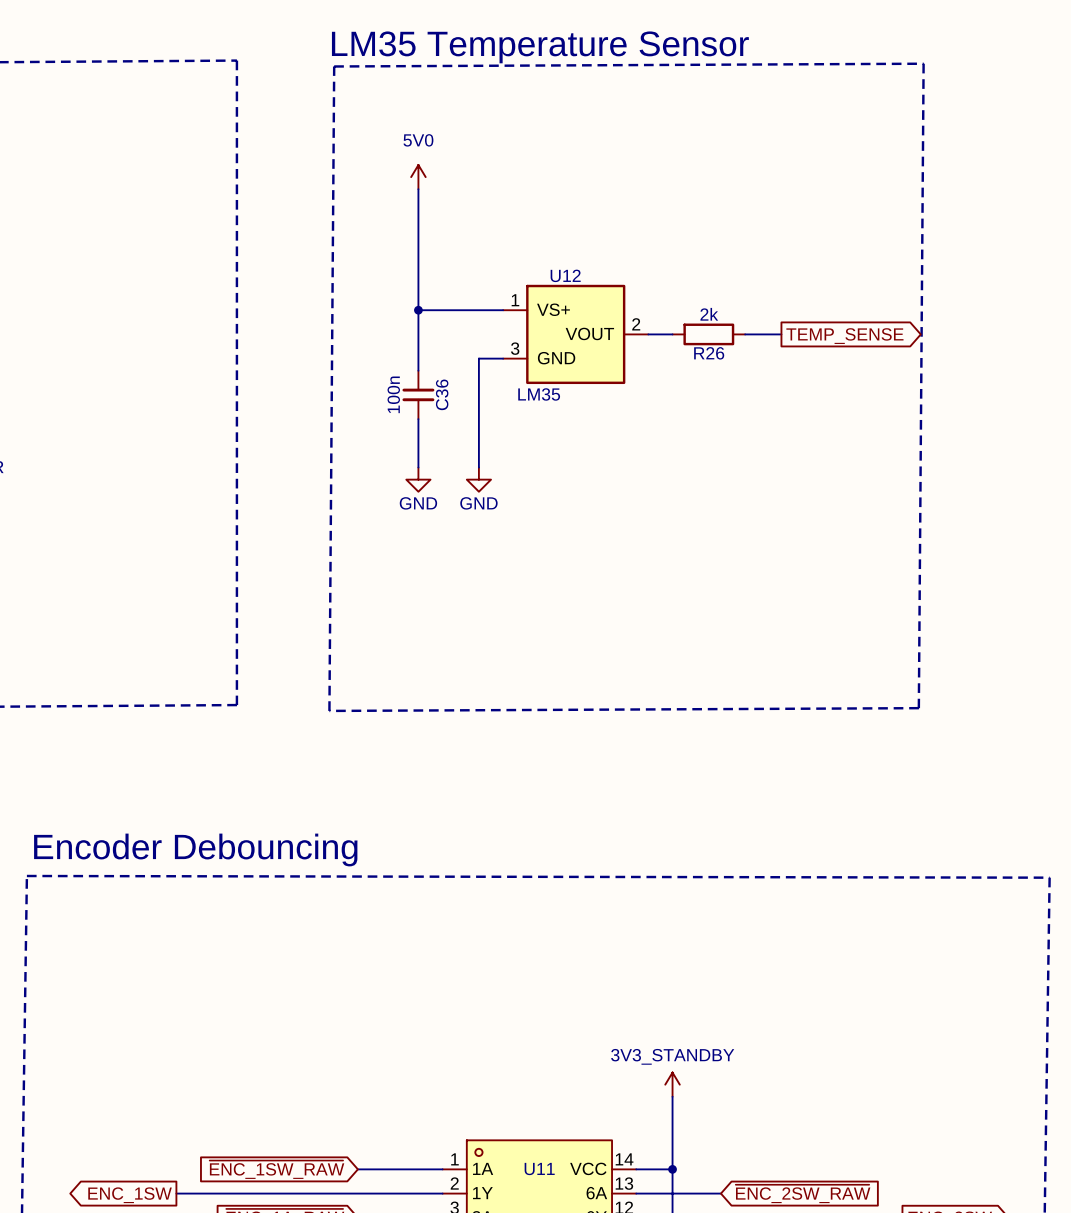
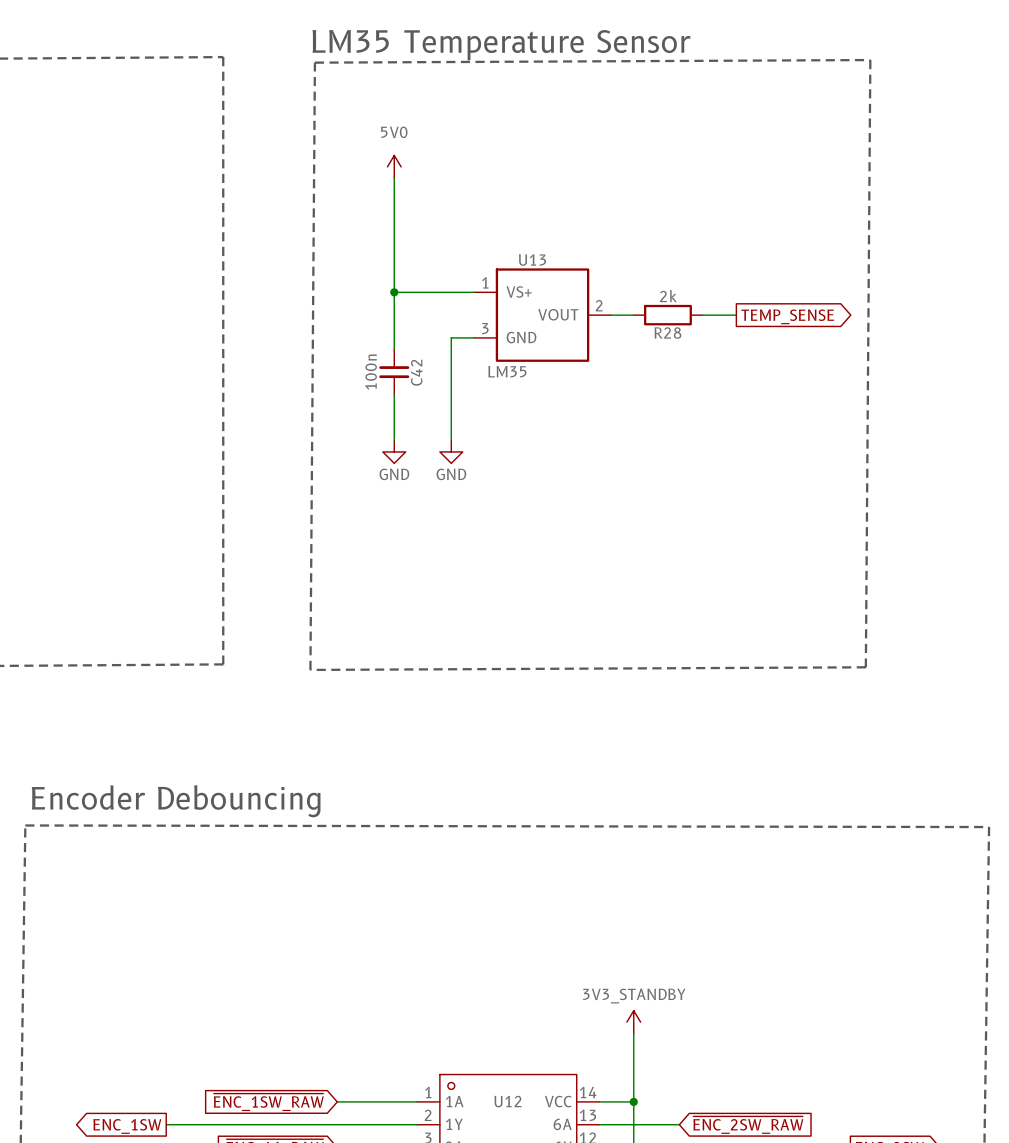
U12 name: U12 (565, 275) -> U13 (532, 260)
R26 name: R26 (709, 353) -> R28 (667, 333)
C36 name: C36 (442, 394) -> C42 (416, 372)
U11 name: U11 (539, 1169) -> U12 (507, 1101)

